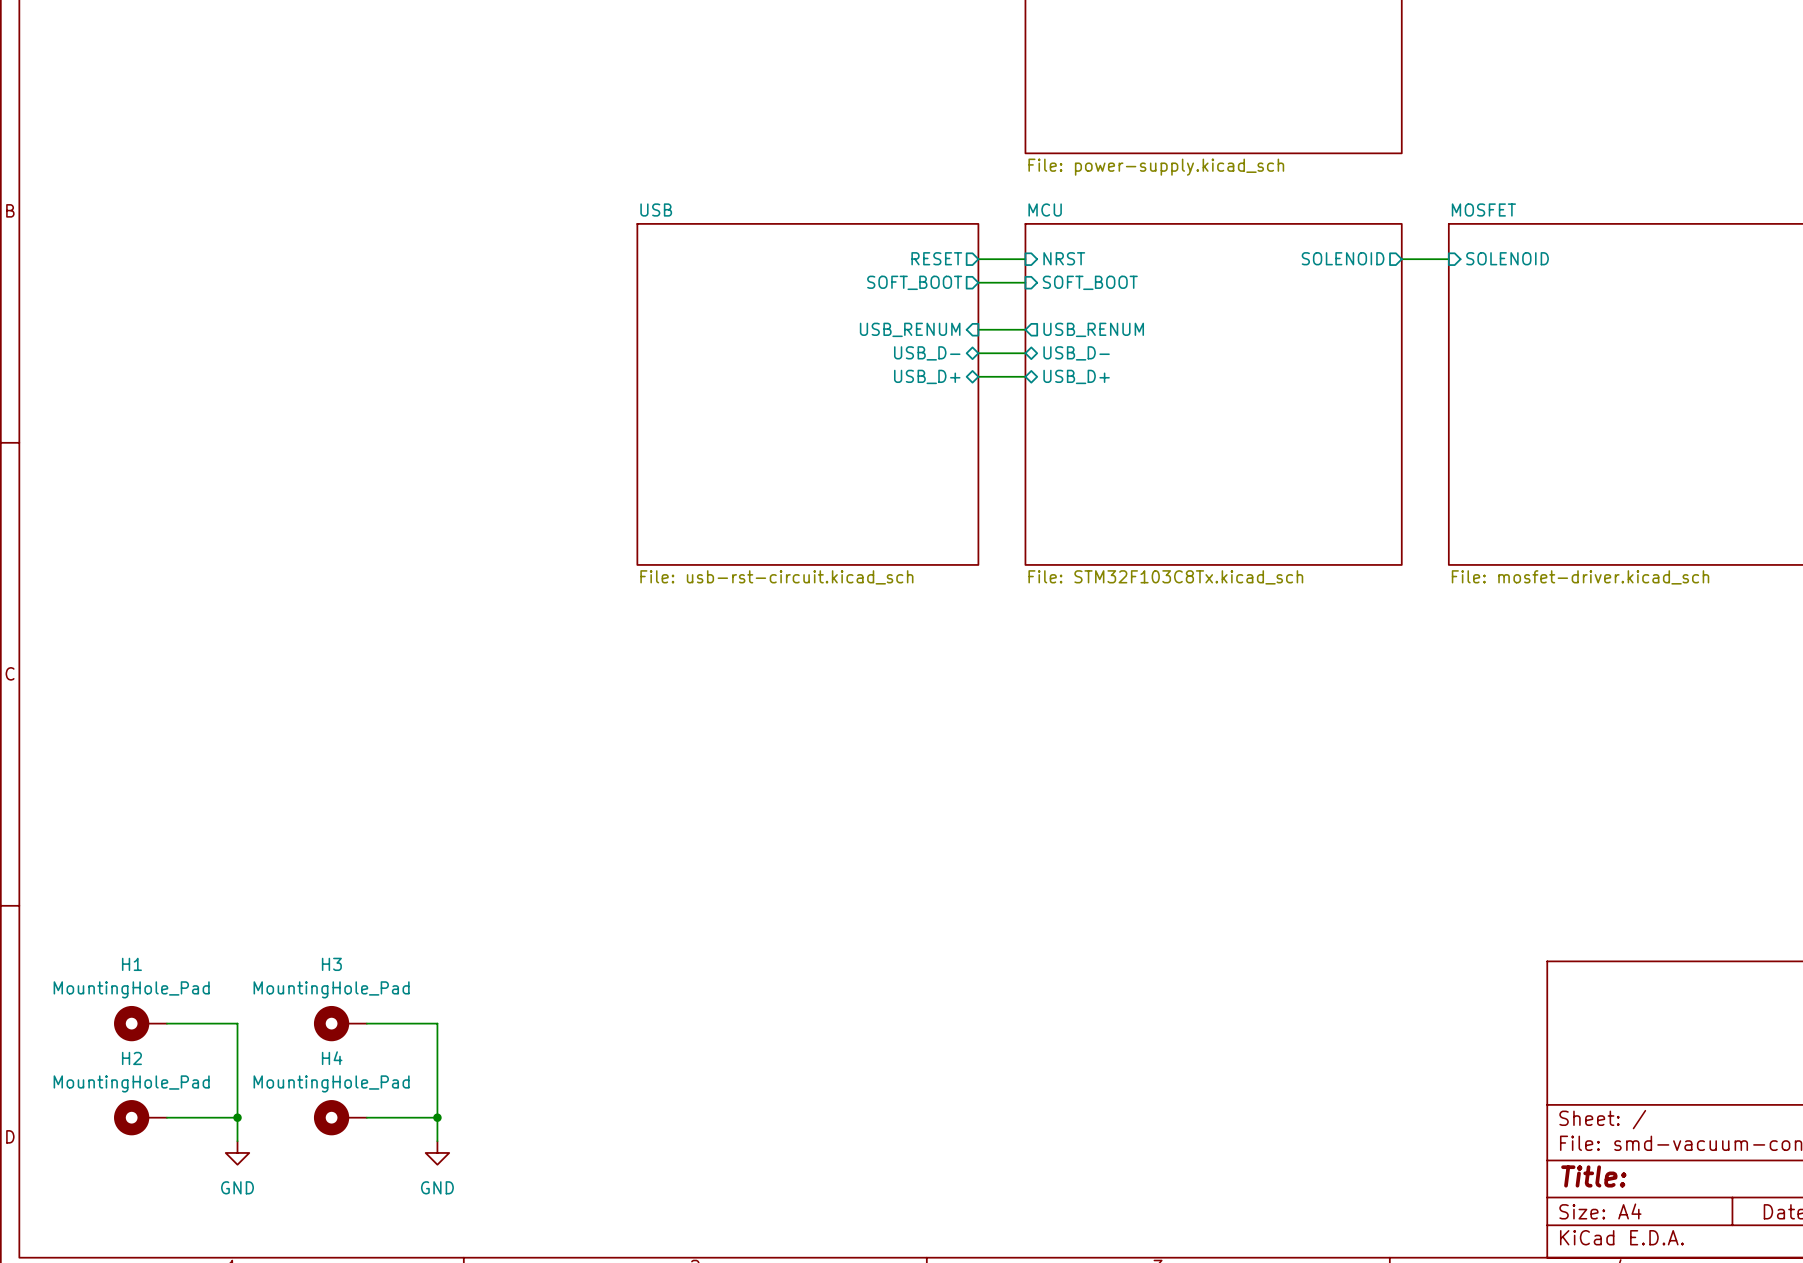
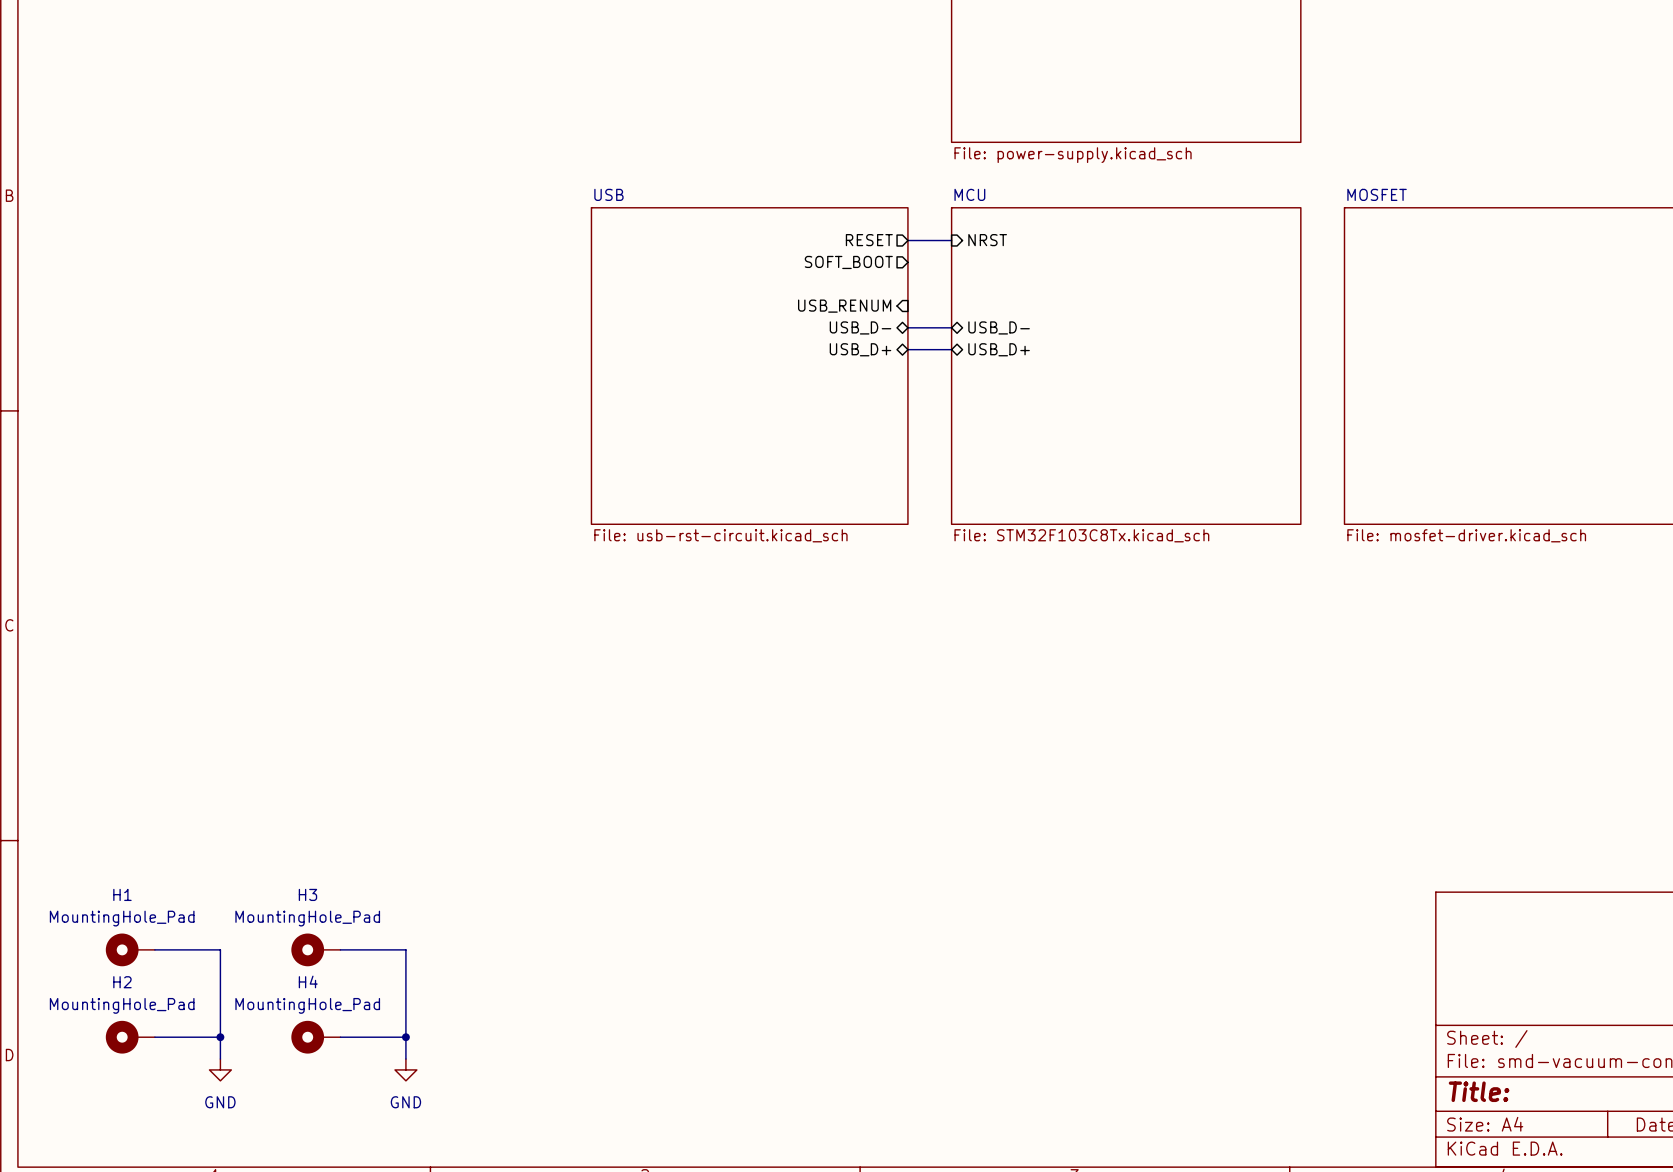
sheet pin: SOLENOID (1343, 258) -> none
sheet pin: SOLENOID (1507, 258) -> none
wire: (1401, 259) (1448, 259) -> none
wire: (978, 282) (1025, 282) -> none
sheet pin: SOFT_BOOT (1090, 282) -> none
wire: (978, 329) (1025, 329) -> none
sheet pin: USB_RENUM (1093, 329) -> none

